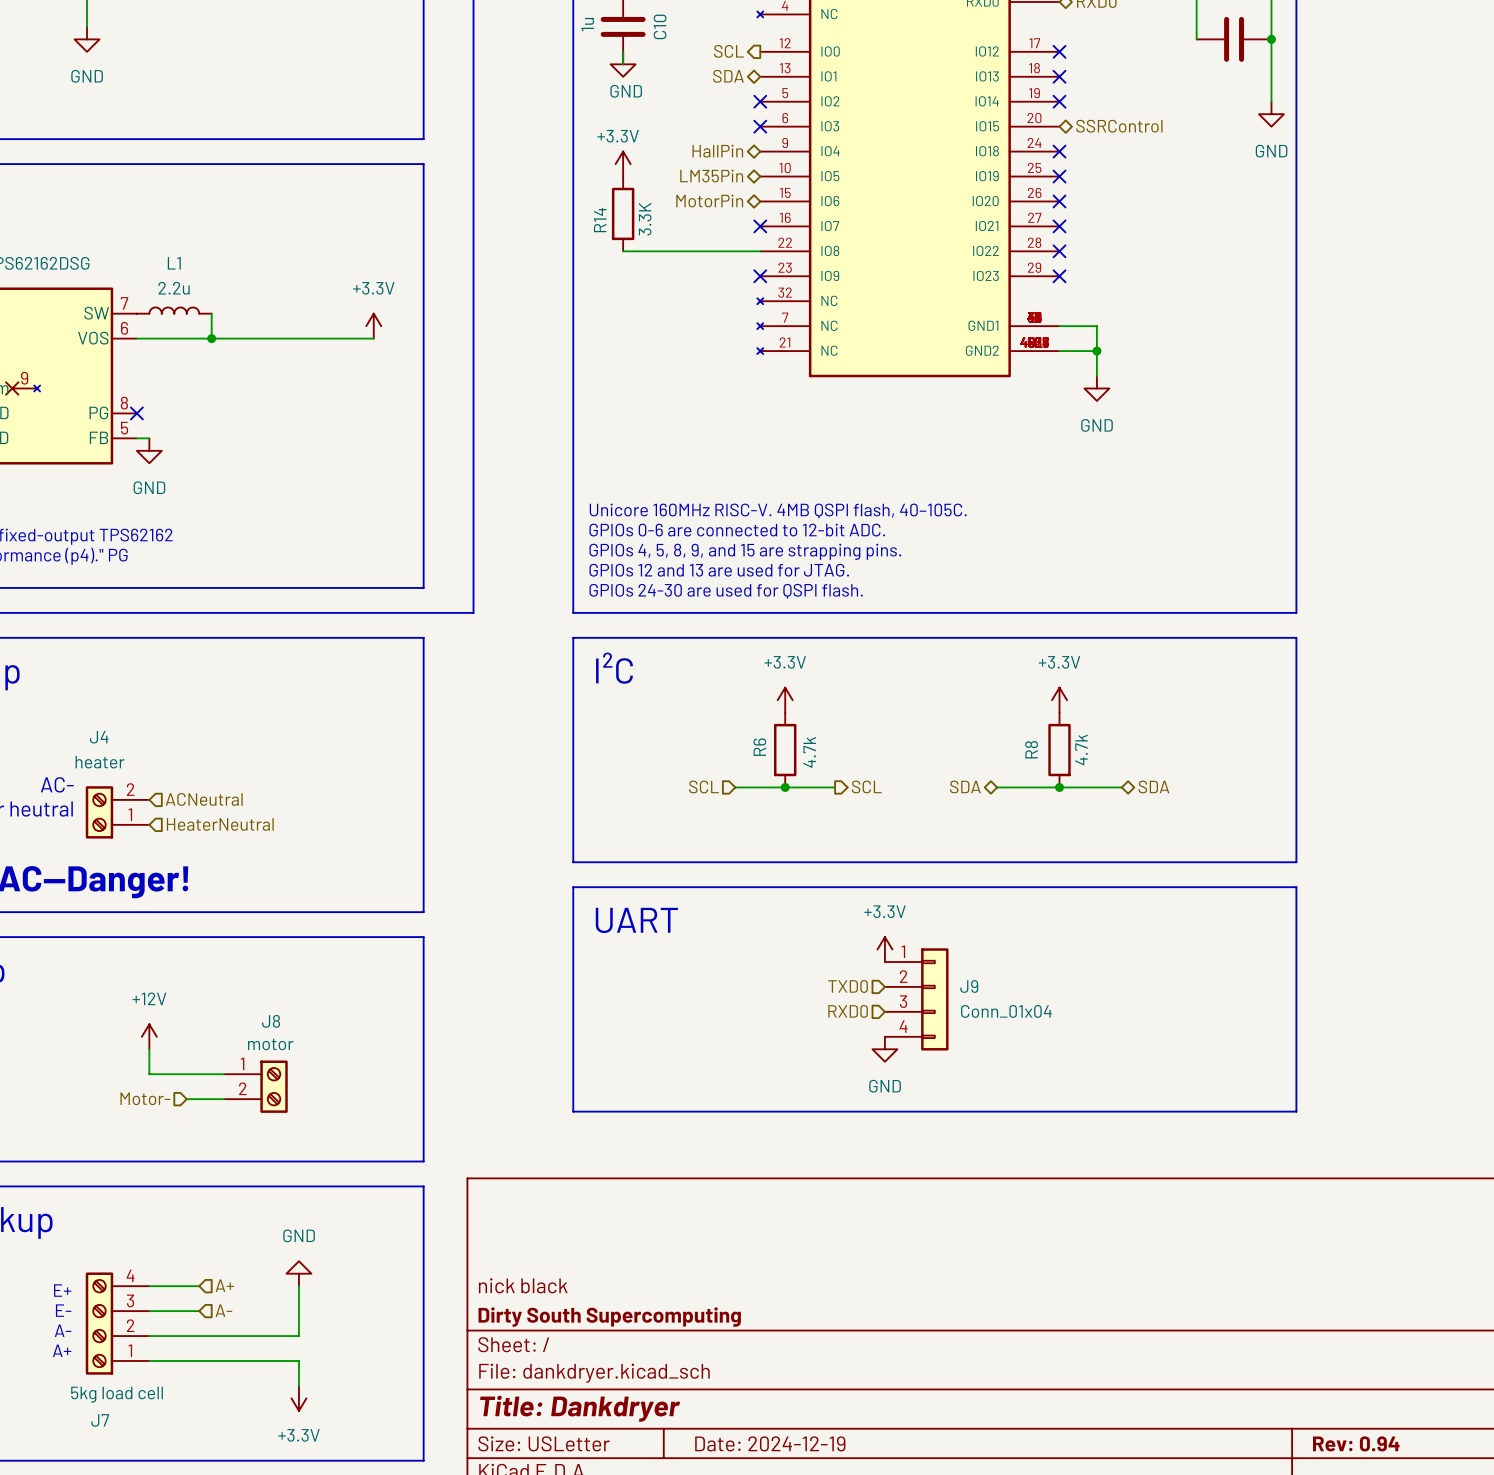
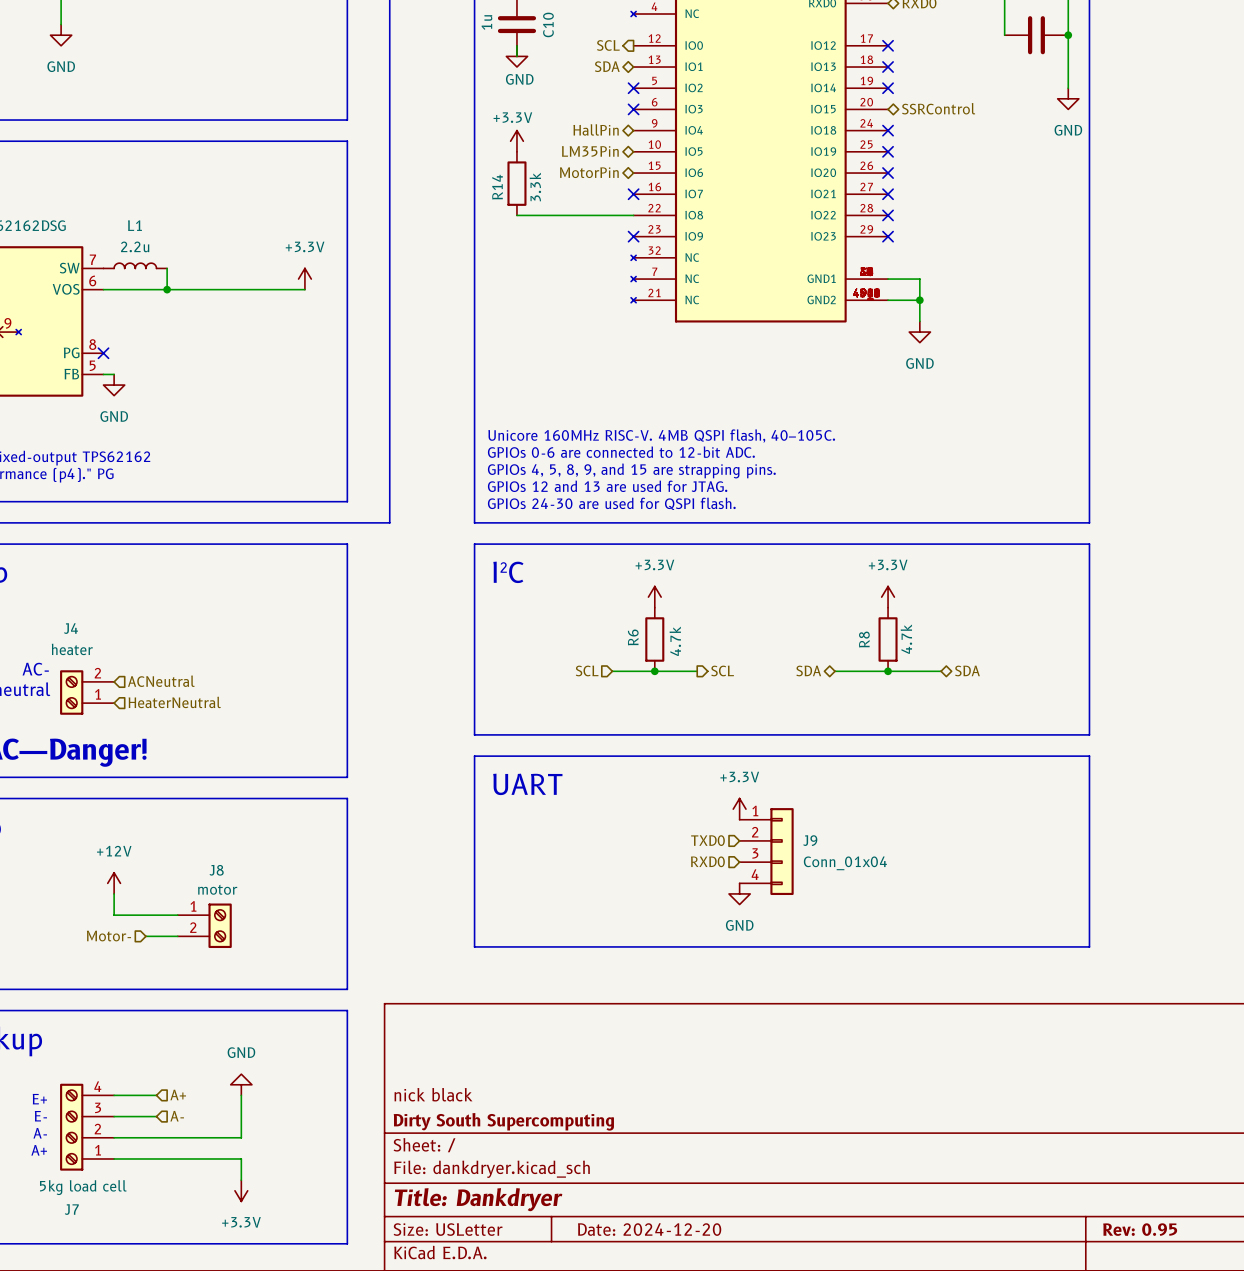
R14 value: 3.3K (645, 219) -> 3.3k (535, 187)
title block: Date: 2024-12-19 (770, 1443) -> Date: 2024-12-20 (649, 1229)
title block: Rev: 0.94 (1356, 1443) -> Rev: 0.95 (1140, 1229)

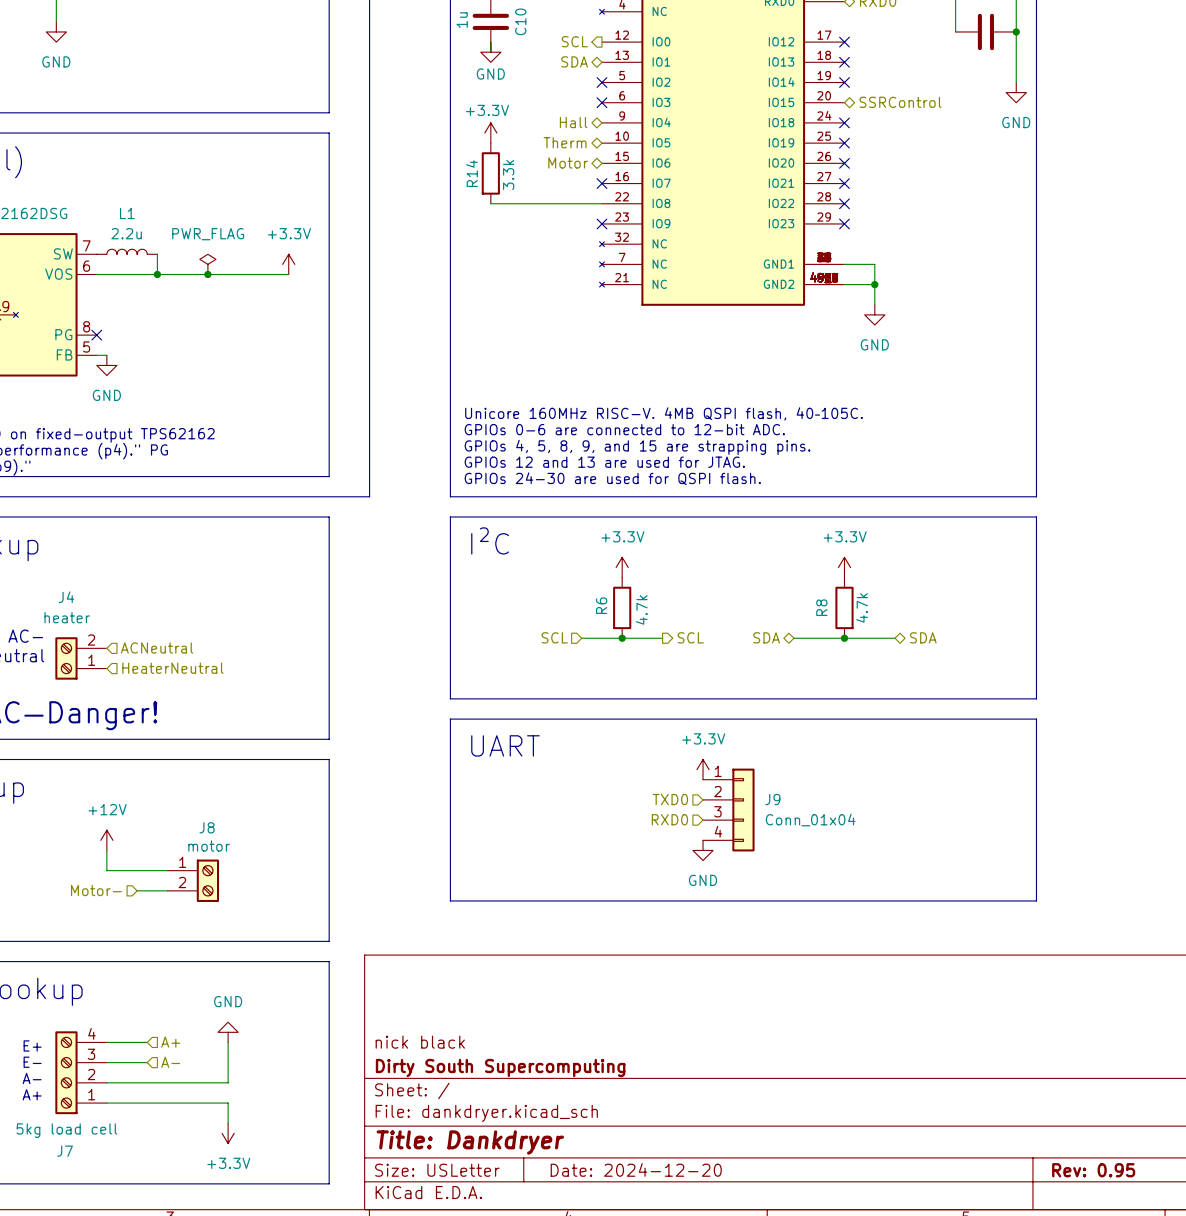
hierarchical label: HallPin (596, 129) -> Hall (573, 122)
hierarchical label: LM35Pin (590, 151) -> Therm (565, 142)
hierarchical label: MotorPin (589, 172) -> Motor (568, 162)
power symbol: none -> PWR_FLAG (207, 264)
junction: none -> (207, 274)

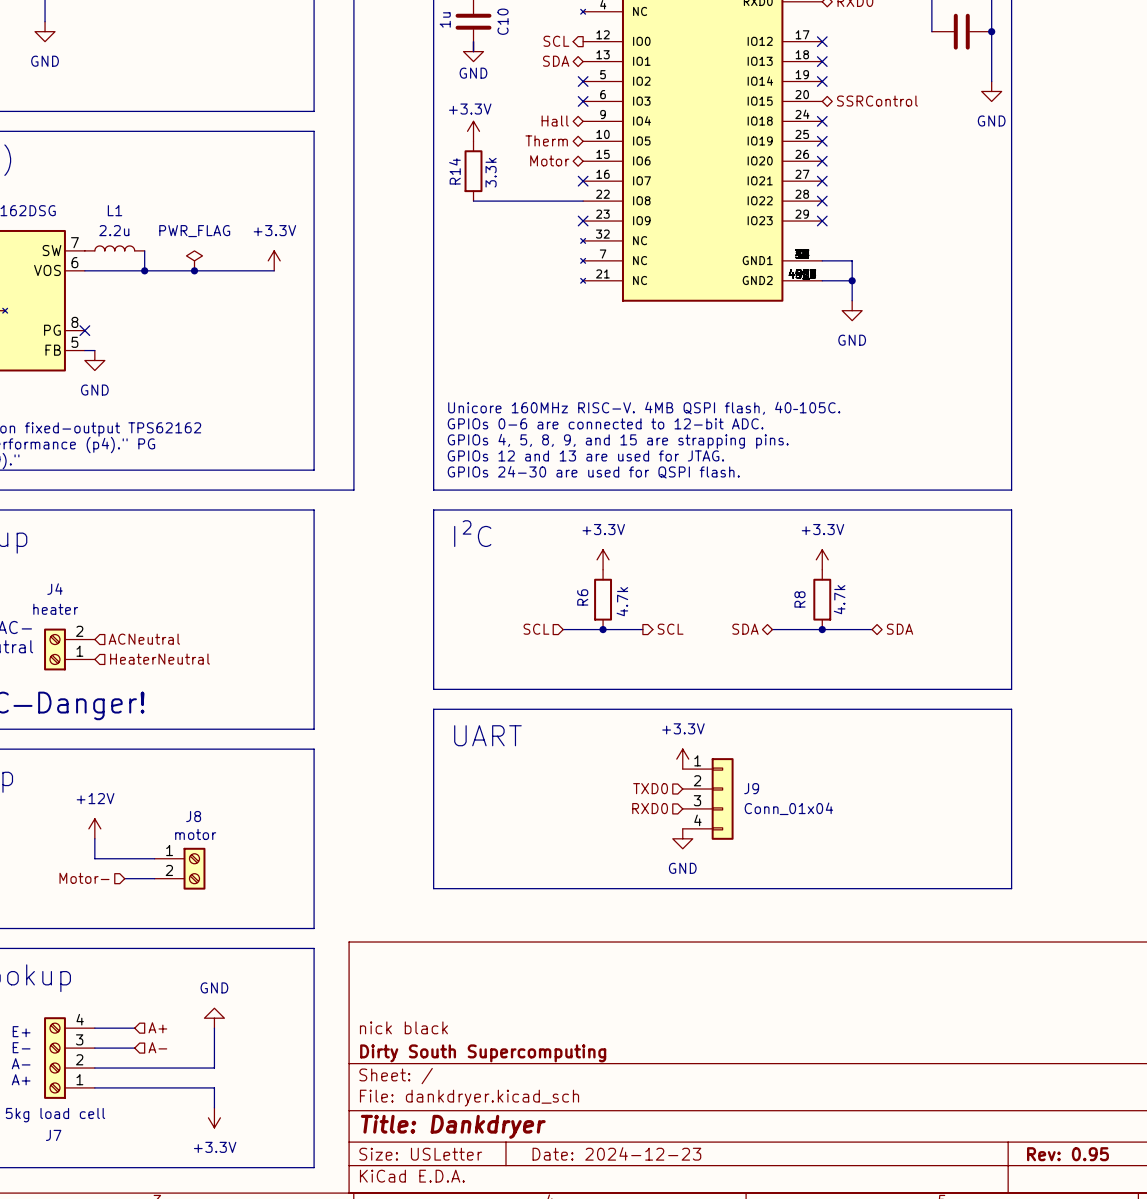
title block: Date: 2024-12-20 (636, 1169) -> Date: 2024-12-23 (616, 1153)

